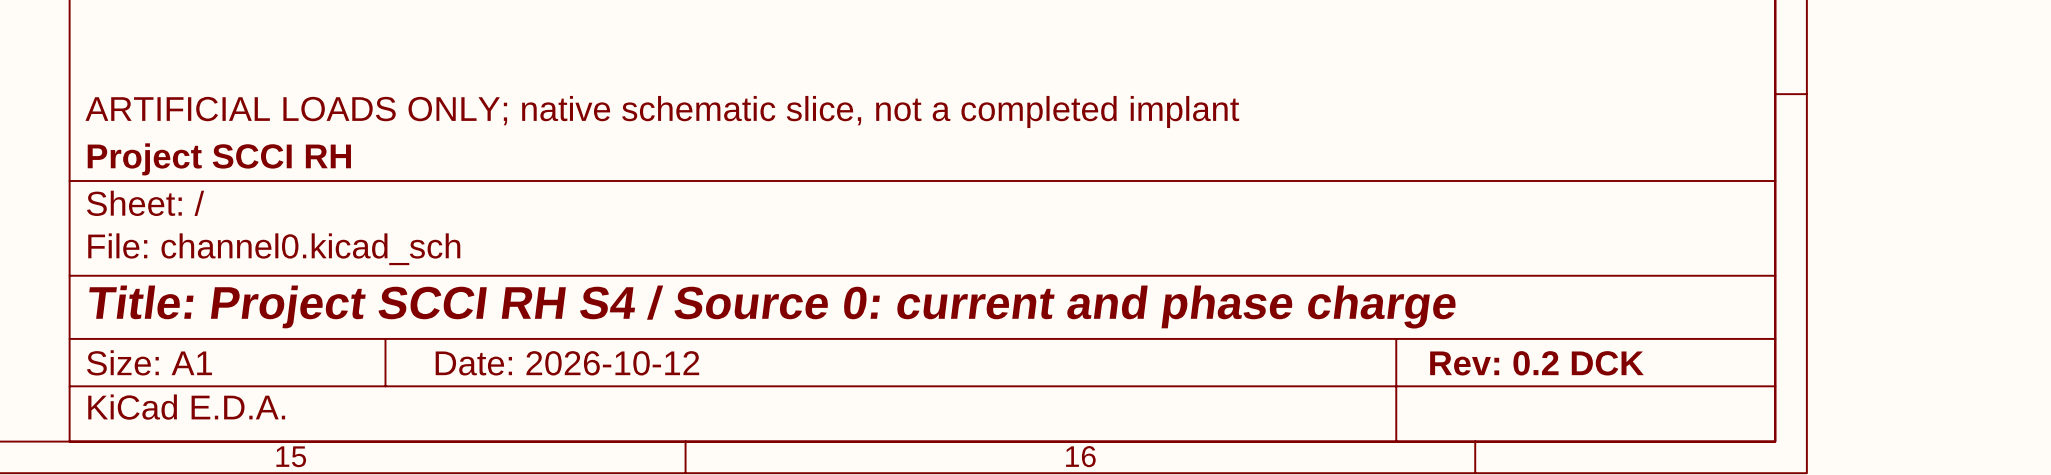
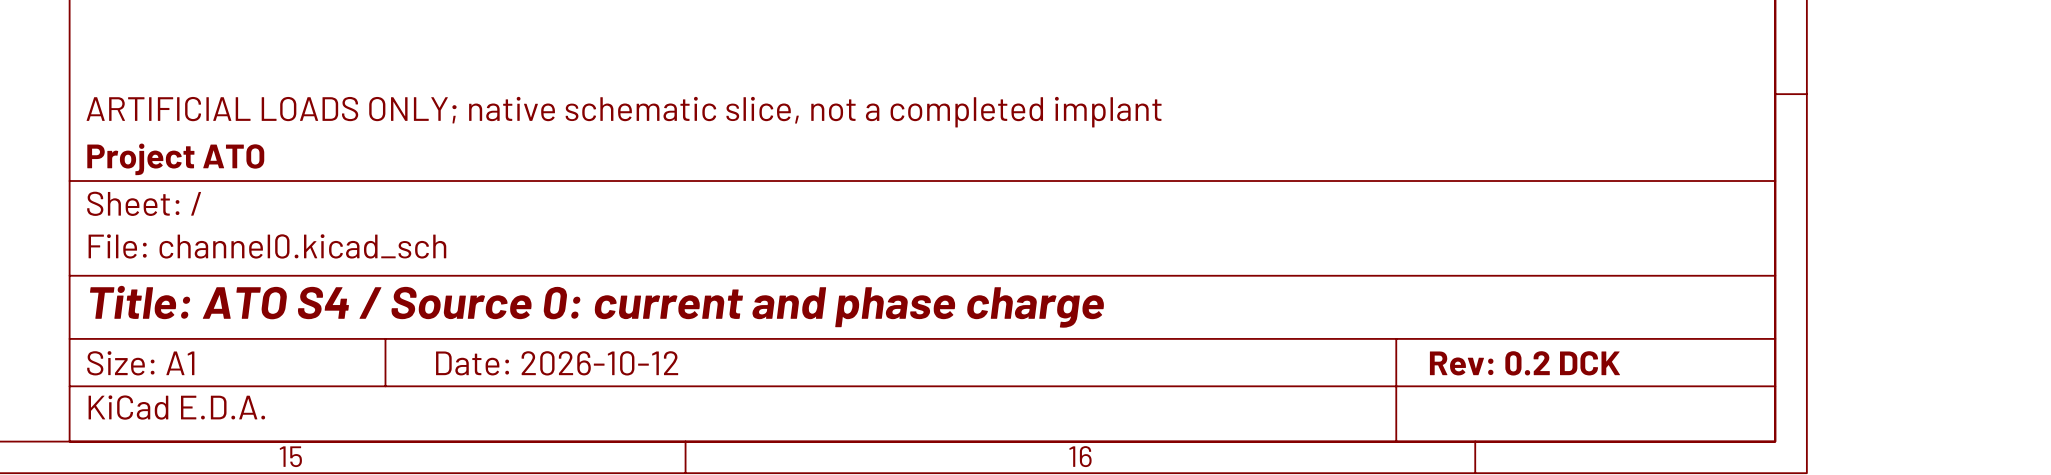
title block: Project SCCI RH (219, 159) -> Project ATO (175, 159)
title block: Title: Project SCCI RH S4 / Source 0: current and phase charge (772, 307) -> Title: ATO S4 / Source 0: current and phase charge (596, 306)

